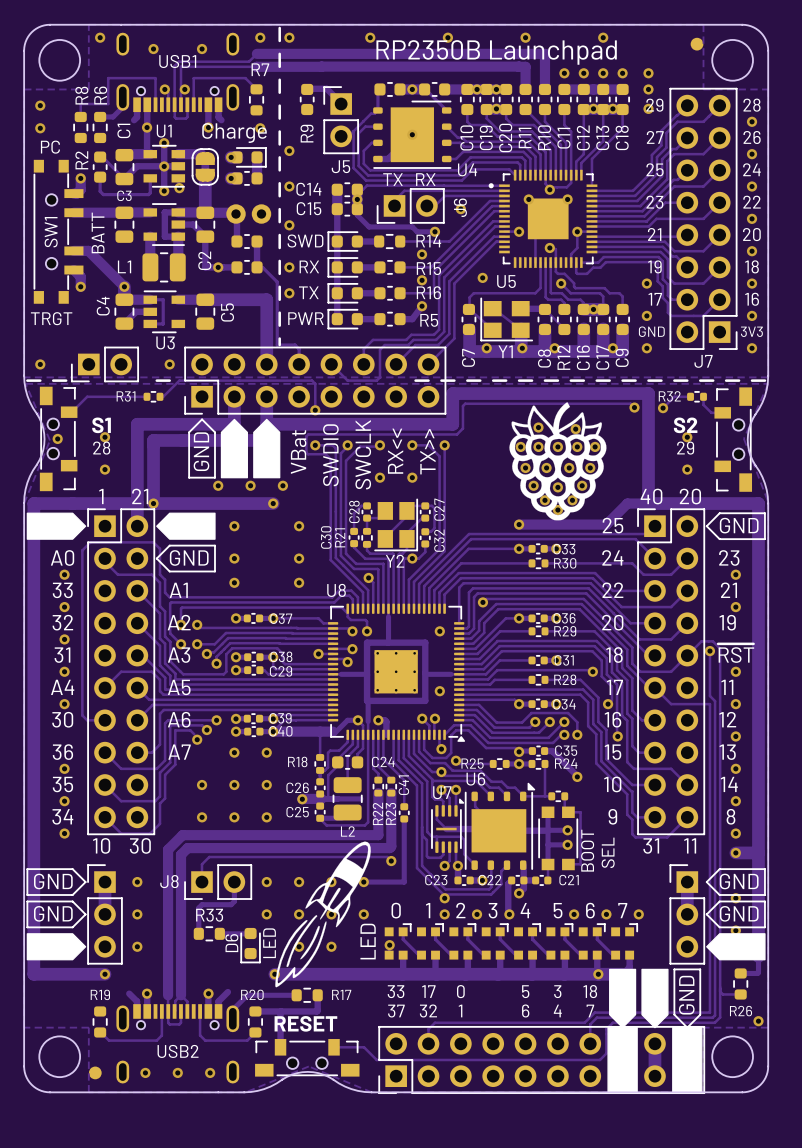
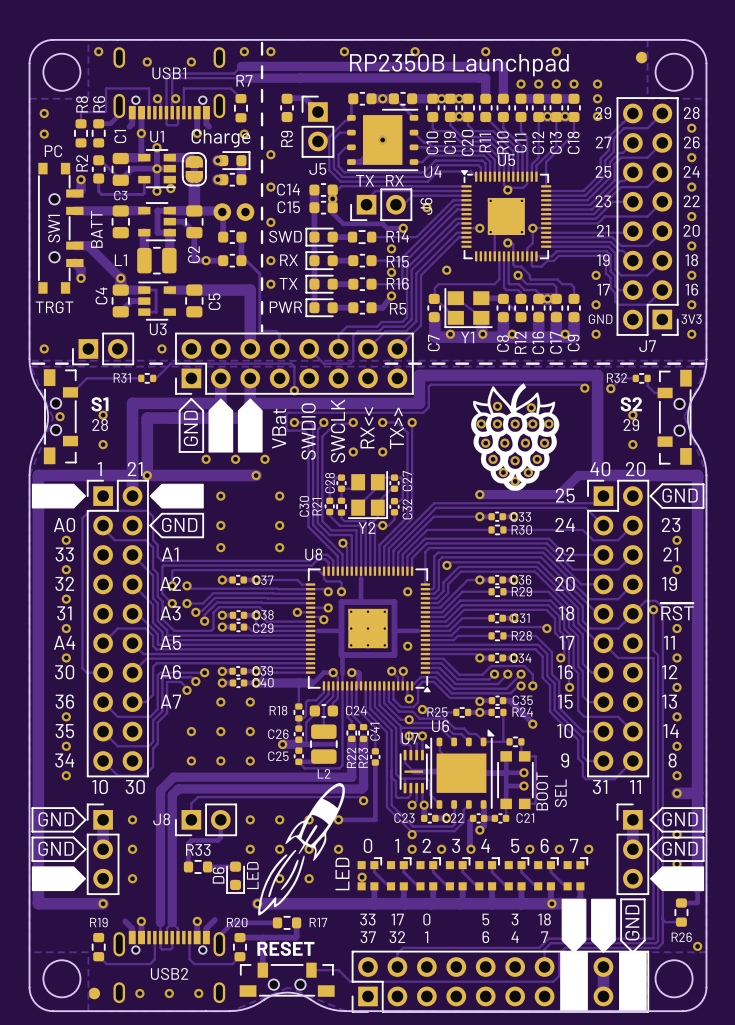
U5 footprint: [488, 169, 598, 268] -> [461, 170, 552, 262]
via: (528, 199) -> none
via: (567, 199) -> none
U5 name position: U5 (506, 281) -> U5 (506, 160)

